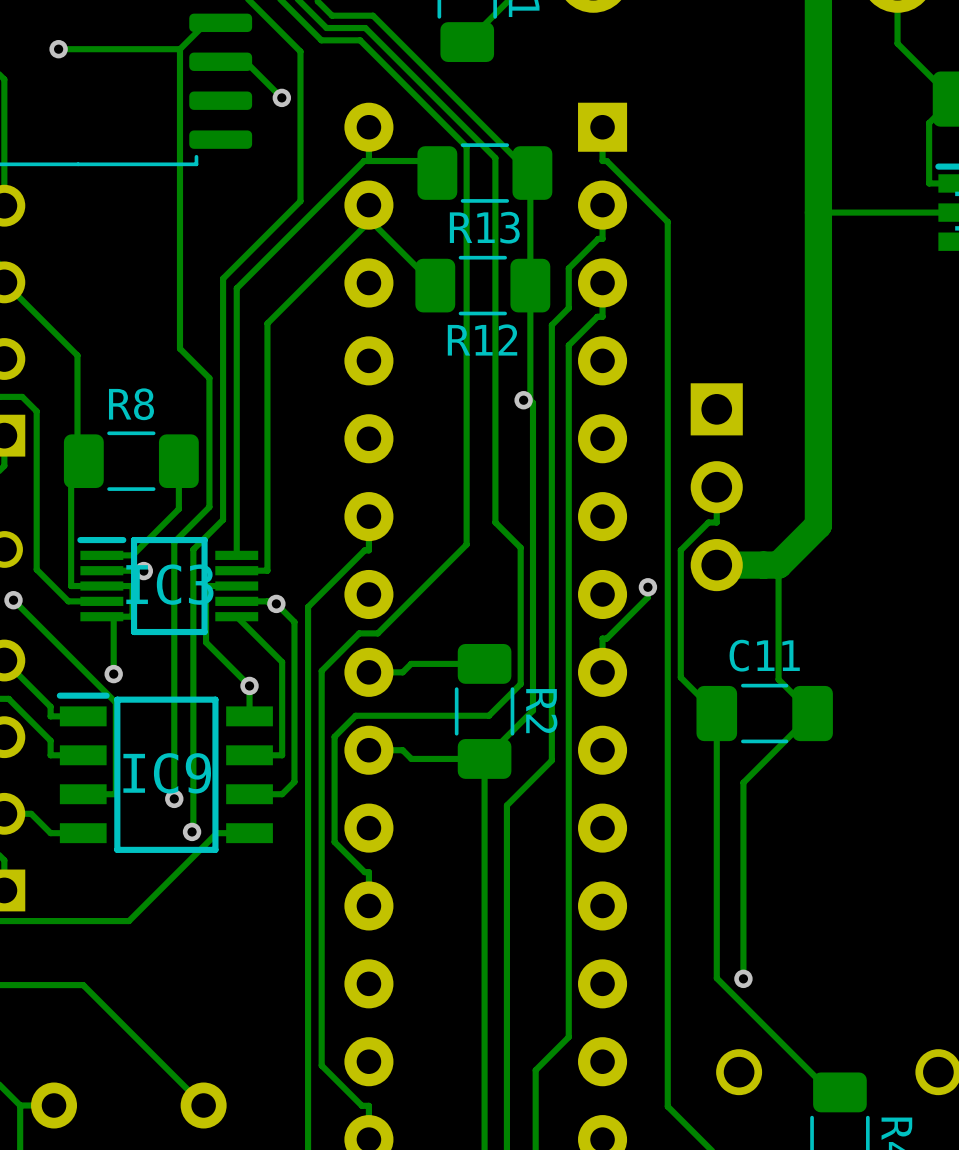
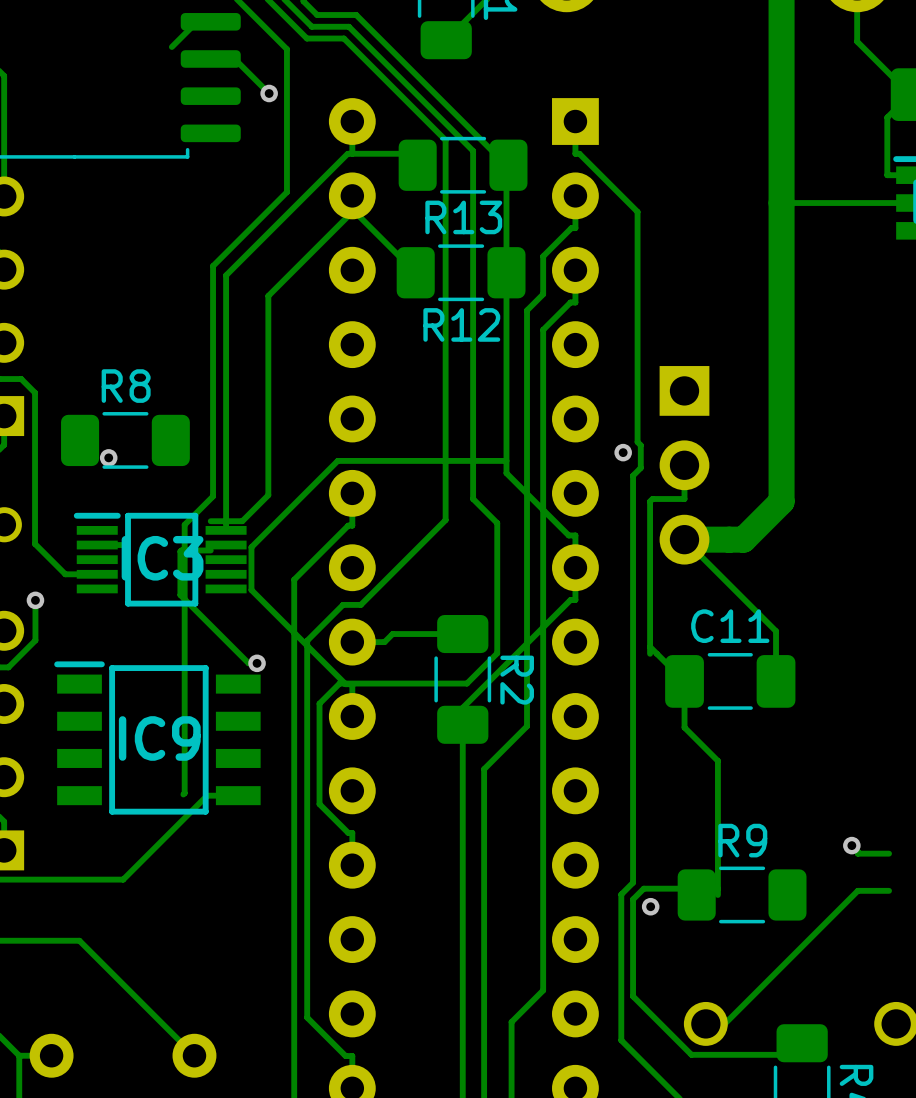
track: (58, 49) (179, 49) (179, 348) (209, 378) (209, 507) (174, 542) (174, 798) -> none
via: (58, 49) -> none
track: (667, 222) (667, 1106) -> (637, 211) (637, 442) (640, 445) (640, 467) (633, 475) (633, 882) (621, 894) (621, 1040) (637, 1056)
track: (4, 282) (77, 355) (77, 461) -> none
track: (280, 309) (267, 323) (267, 570) (236, 570) -> (268, 296) (268, 495) (242, 521) (210, 521)
track: (523, 400) (530, 400) (533, 402) (533, 710) (484, 758) (411, 758) (402, 750) (368, 750) -> (506, 460) (337, 460) (251, 547) (251, 590) (345, 684) (352, 684) (352, 716)
via: (523, 400) -> none
track: none -> (506, 382) (506, 473) (568, 535) (575, 535) (575, 599) (570, 599) (462, 707) (462, 724)
track: (178, 461) (178, 509) (132, 555) (101, 555) -> none
track: (71, 467) (71, 586) (132, 586) (132, 616) (113, 616) (113, 674) -> none
via: none -> (623, 452)
via: none -> (108, 457)
track: (708, 522) (680, 550) -> (676, 499) (652, 499) (650, 501) (650, 525)
track: none -> (684, 539) (776, 631) (776, 681)
track: (778, 565) (778, 679) (812, 713) (743, 782) (743, 978) -> none
via: (143, 571) -> none
track: none -> (210, 550) (180, 551) (180, 595) (248, 663) (257, 663)
track: (236, 586) (206, 586) (206, 642) (249, 685) (249, 716) -> none
track: (647, 587) (647, 597) (606, 638) (602, 638) (602, 672) -> none
via: (647, 587) -> none
track: (13, 600) (115, 702) (115, 794) (83, 794) -> none
via position: (13, 600) -> (35, 600)
track: (236, 601) (267, 601) (270, 603) (276, 603) (294, 622) (294, 781) (282, 794) (249, 794) -> none
via: (276, 603) -> none
track: (236, 616) (282, 662) (282, 755) (249, 755) -> none
track: (4, 660) (50, 706) (50, 716) (83, 716) -> none
via: (113, 674) -> none
via position: (249, 685) -> (257, 663)
track: (8, 698) (50, 740) (50, 755) (83, 755) -> (8, 667) (35, 640) (35, 600)
track: (716, 761) (716, 978) (830, 1092) -> (684, 727) (717, 760) (717, 894)
via: (174, 798) -> none
track: (4, 813) (31, 813) (50, 833) (83, 833) -> none
via: (192, 831) -> none
track: none -> (851, 845) (857, 853) (889, 853)
via: none -> (851, 845)
track: none -> (717, 888) (643, 888) (633, 899) (633, 996) (691, 1054) (790, 1054) (802, 1043)
track: none -> (889, 890) (857, 890) (724, 1023) (705, 1023)
R9: none -> (742, 894)
via position: (743, 978) -> (650, 906)

